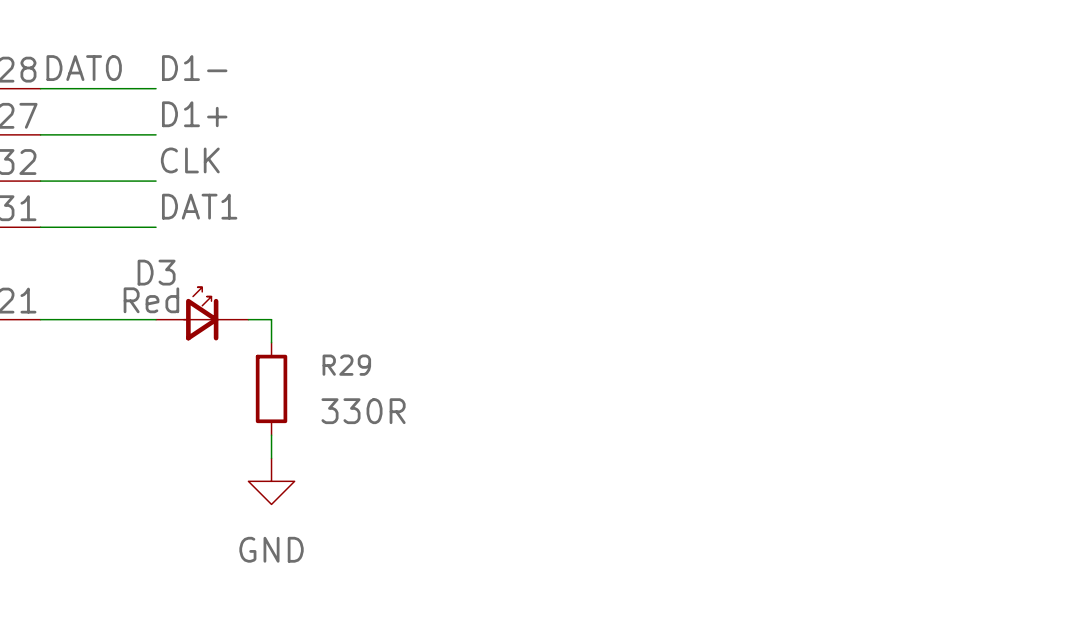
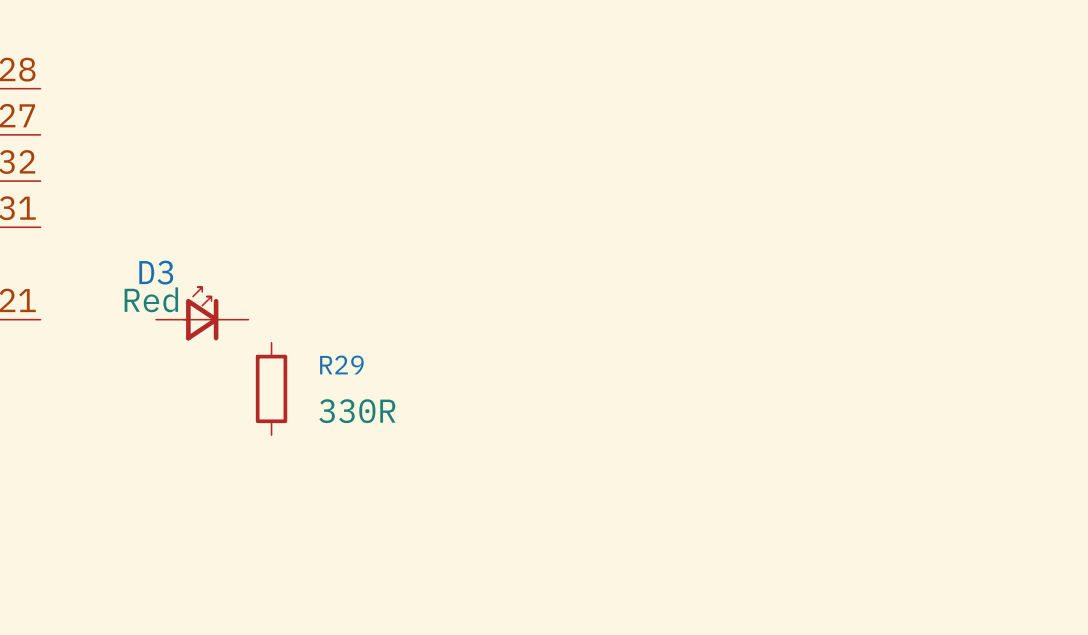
label: DAT0 (84, 68) -> none
label: D1- (194, 68) -> none
wire: (40, 88) (156, 88) -> none
label: D1+ (194, 114) -> none
wire: (40, 134) (156, 134) -> none
label: CLK (190, 160) -> none
wire: (40, 181) (156, 181) -> none
label: DAT1 (199, 206) -> none
wire: (40, 227) (156, 227) -> none
wire: (40, 319) (156, 319) -> none
wire: (248, 319) (271, 319) (271, 342) -> none
wire: (271, 435) (271, 458) -> none
power symbol: GND (271, 481) -> none

